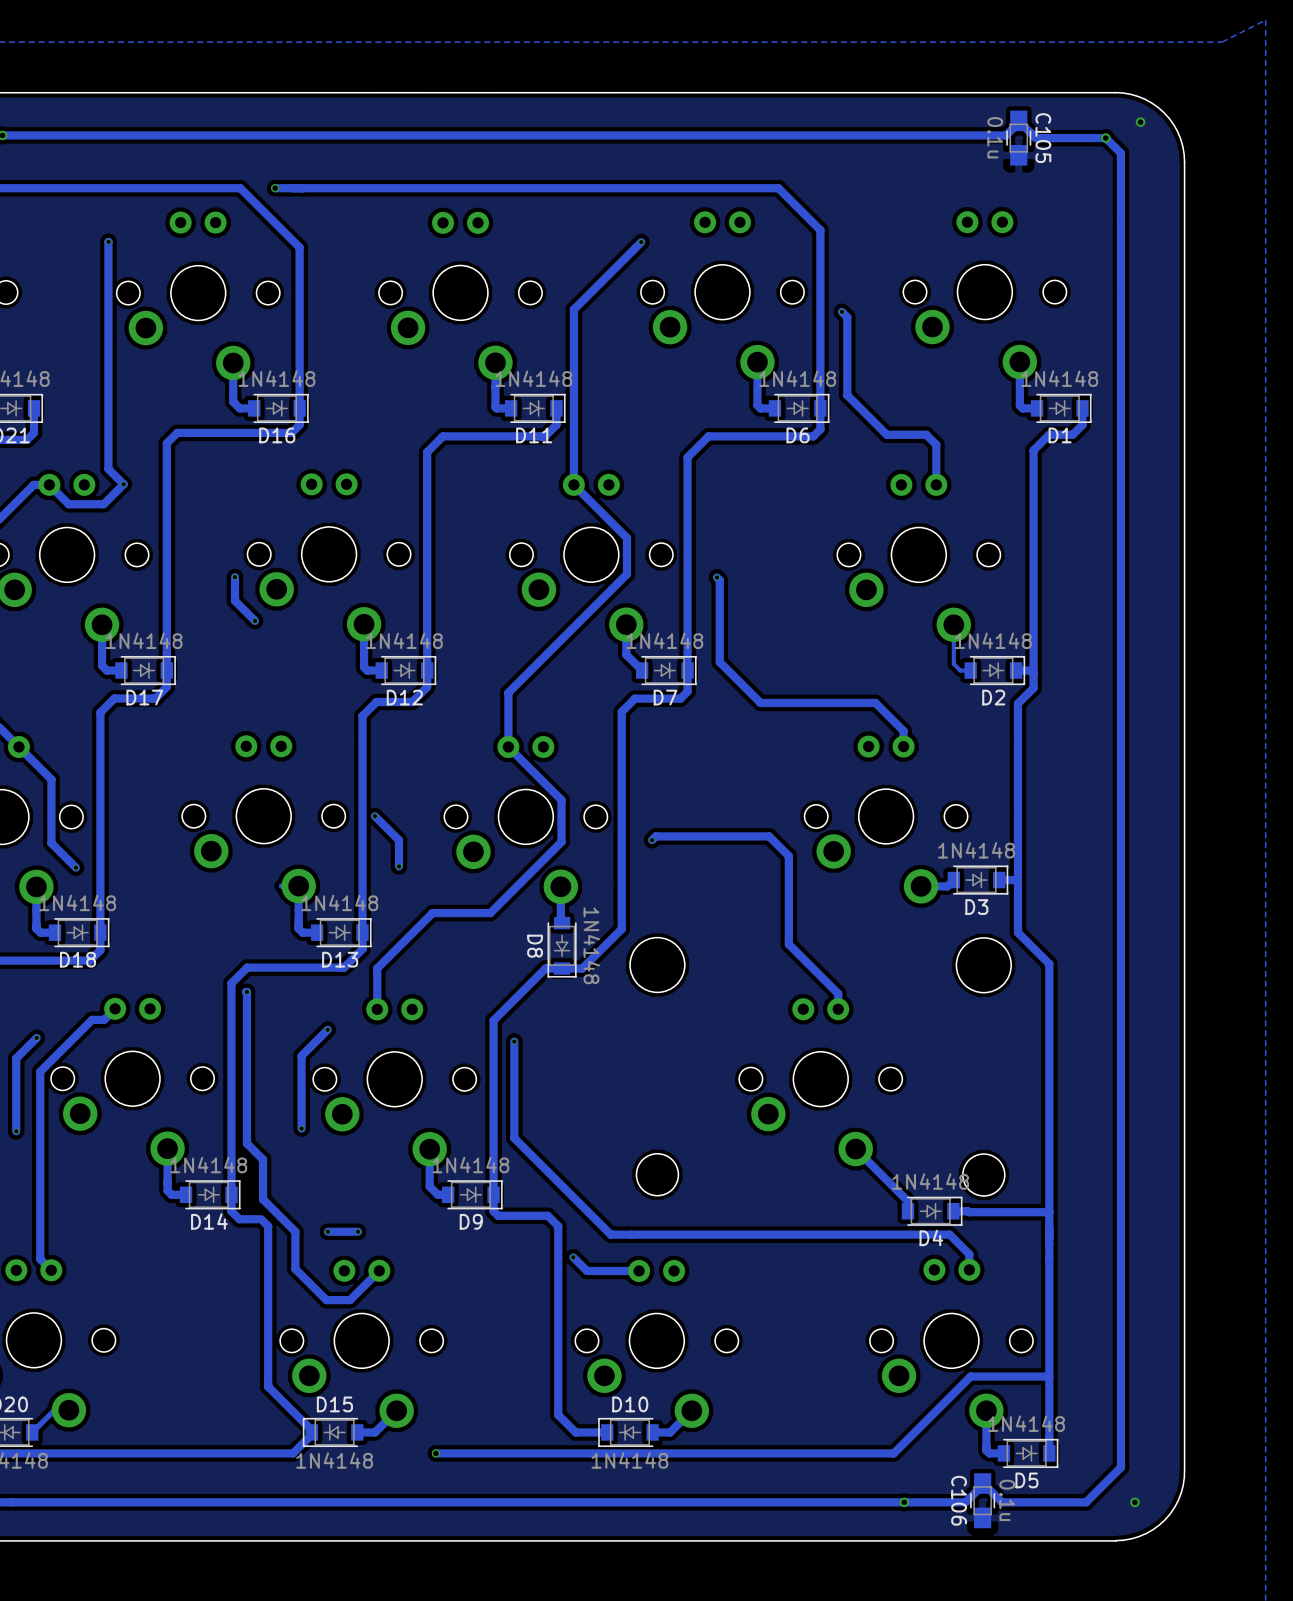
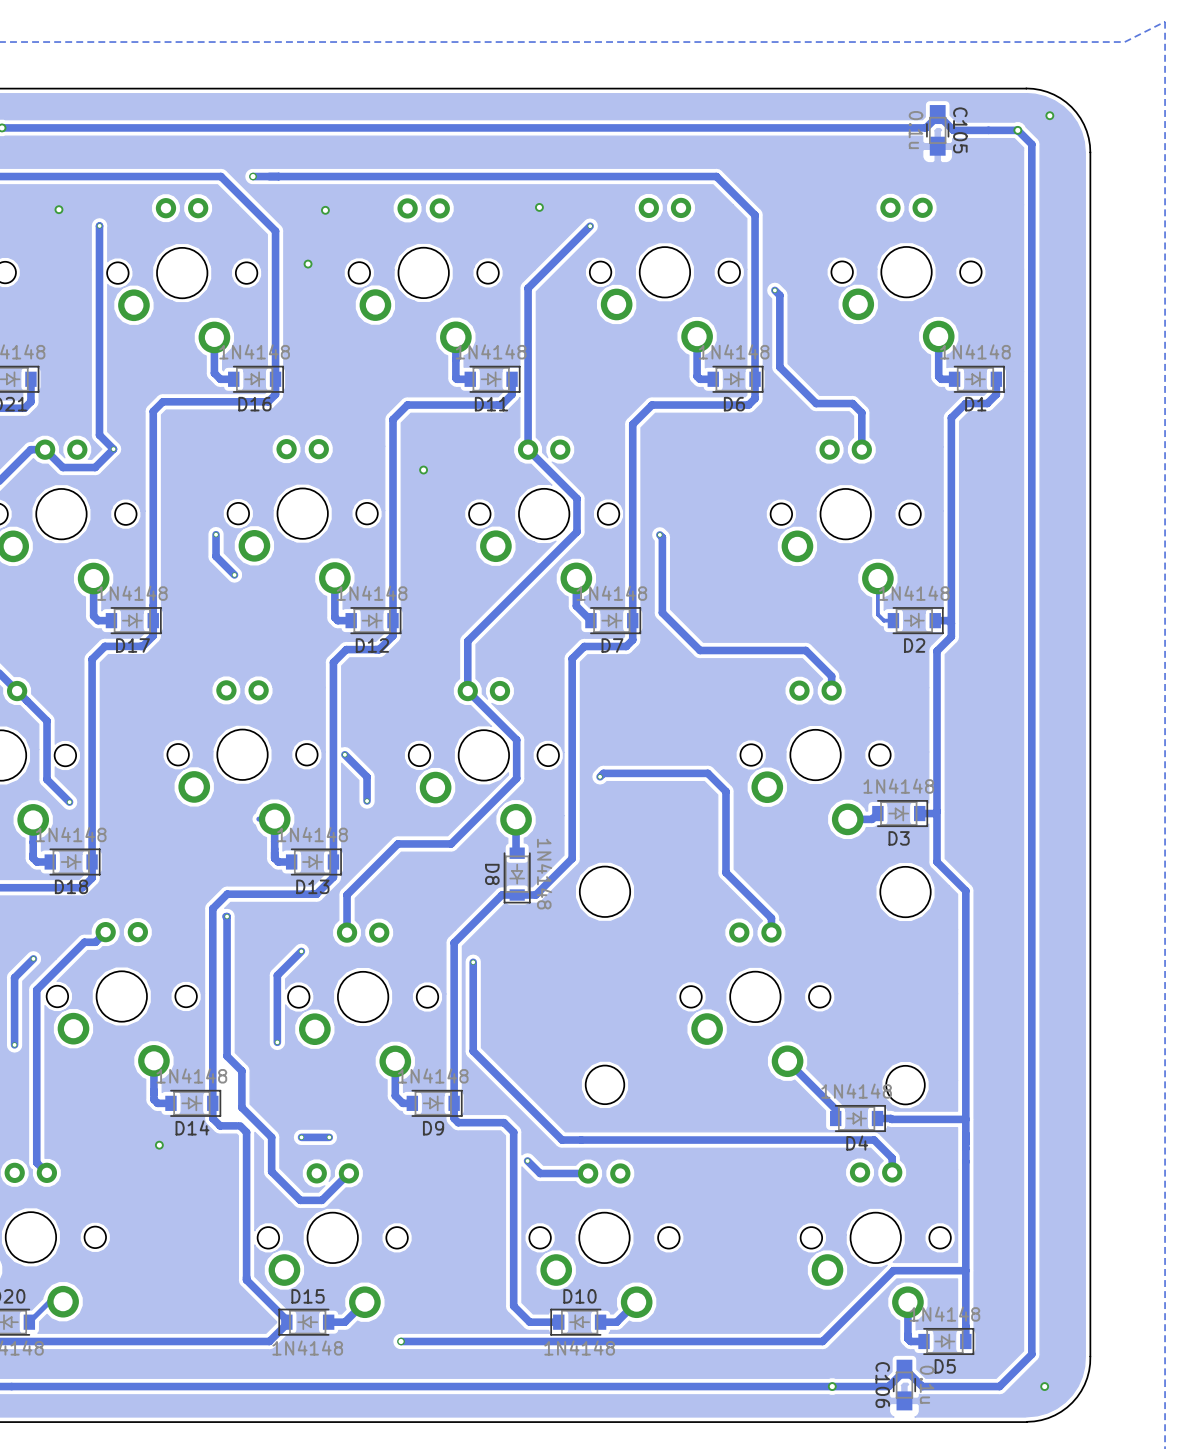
via: none -> (539, 207)
via: none -> (58, 209)
via: none -> (325, 210)
via: none -> (308, 264)
via: none -> (423, 470)
via: none -> (159, 1145)

